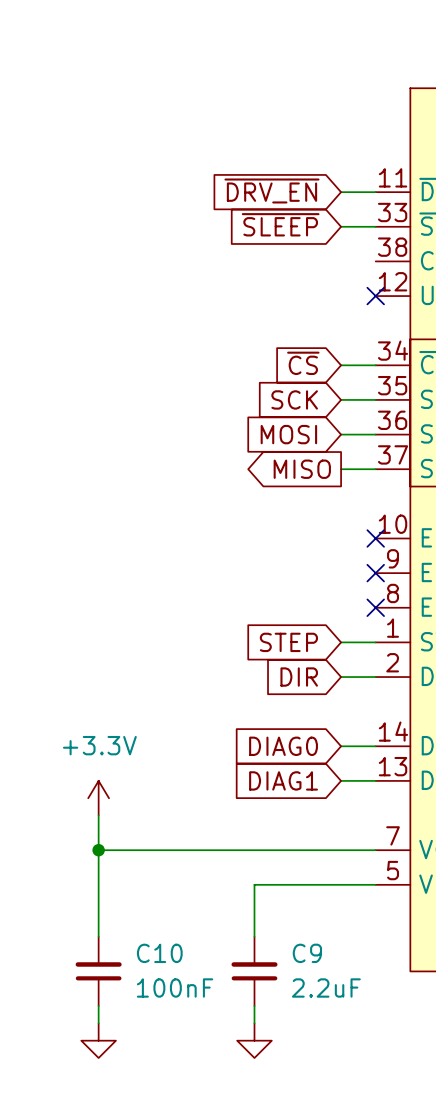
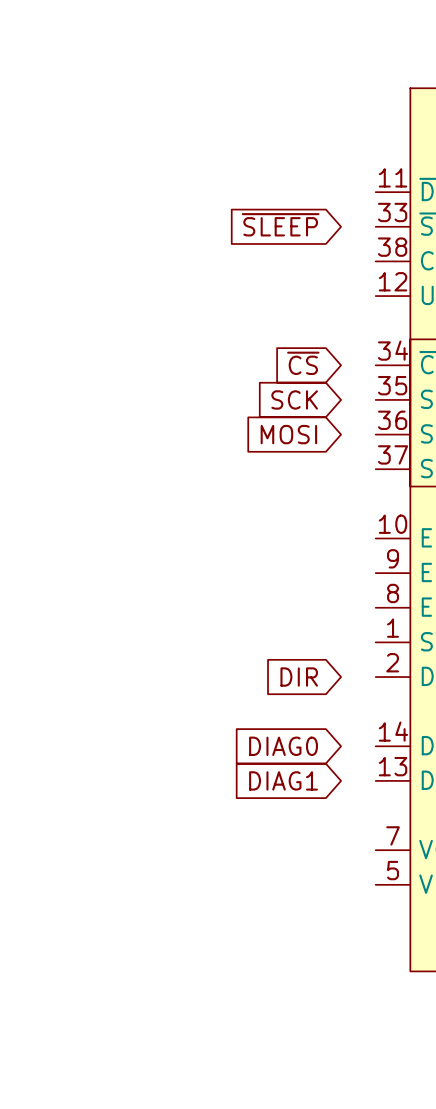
global label: ~{DRV_EN} (271, 190) -> none
wire: (341, 192) (375, 192) -> none
wire: (341, 226) (375, 226) -> none
no-connect mark: (375, 296) -> none
wire: (341, 365) (375, 365) -> none
wire: (341, 399) (375, 399) -> none
wire: (341, 434) (375, 434) -> none
global label: MISO (302, 469) -> none
wire: (341, 469) (375, 469) -> none
no-connect mark: (375, 538) -> none
no-connect mark: (375, 573) -> none
no-connect mark: (375, 607) -> none
global label: STEP (288, 642) -> none
wire: (341, 642) (375, 642) -> none
wire: (341, 677) (375, 677) -> none
wire: (341, 746) (375, 746) -> none
wire: (341, 780) (375, 780) -> none
power symbol: +3.3V (98, 798) -> none
wire: (98, 815) (98, 936) -> none
wire: (98, 850) (375, 850) -> none
junction: (98, 850) -> none
wire: (375, 884) (254, 884) (254, 936) -> none
C10: 100nF (98, 971) -> none
C9: 2.2uF (254, 971) -> none
wire: (98, 1006) (98, 1023) -> none
wire: (254, 1006) (254, 1023) -> none
power symbol: (98, 1040) -> none
power symbol: (254, 1040) -> none

